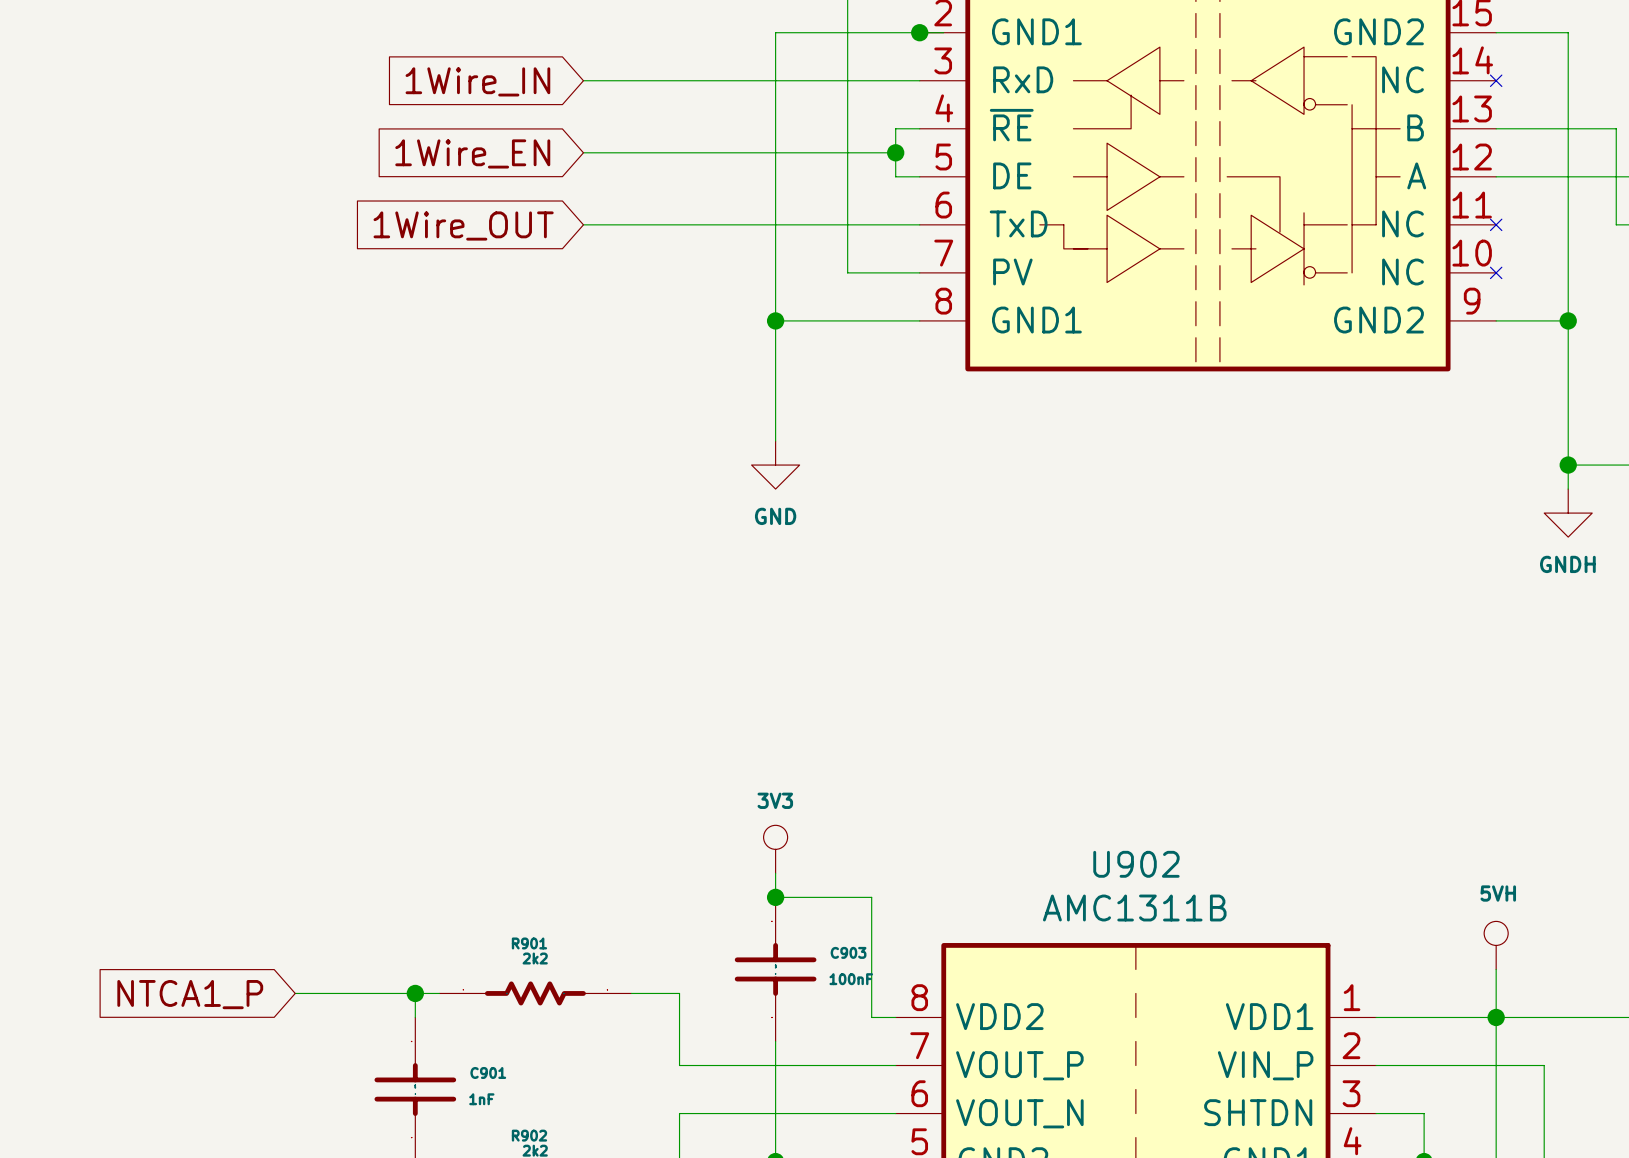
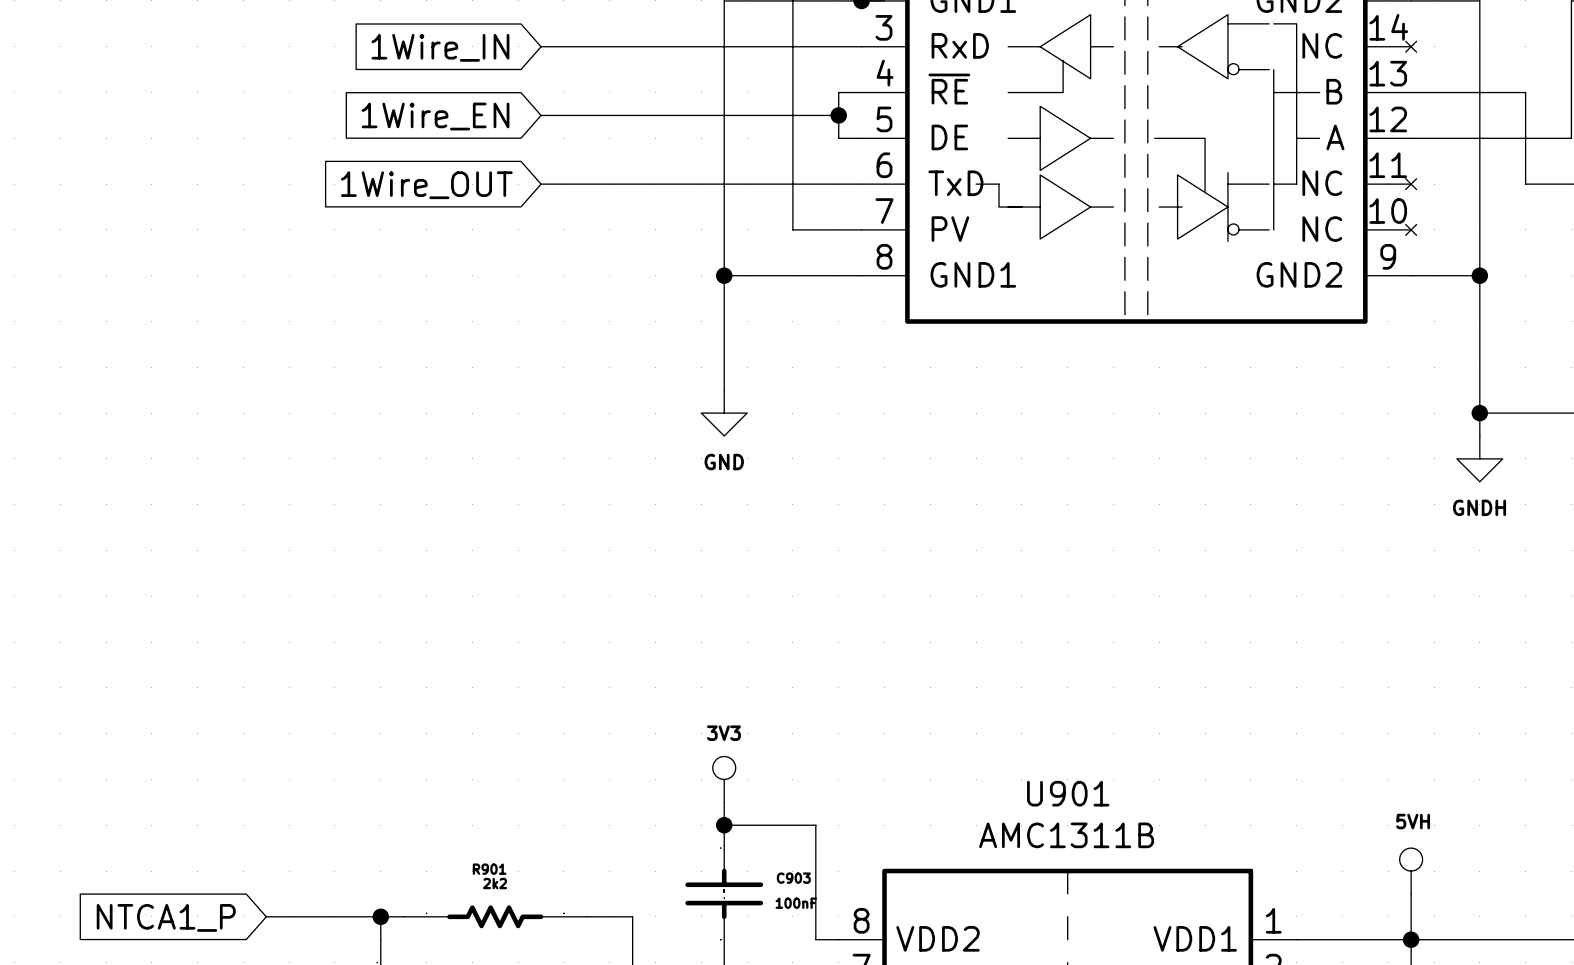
U902 name: U902 (1136, 864) -> U901 (1068, 793)

